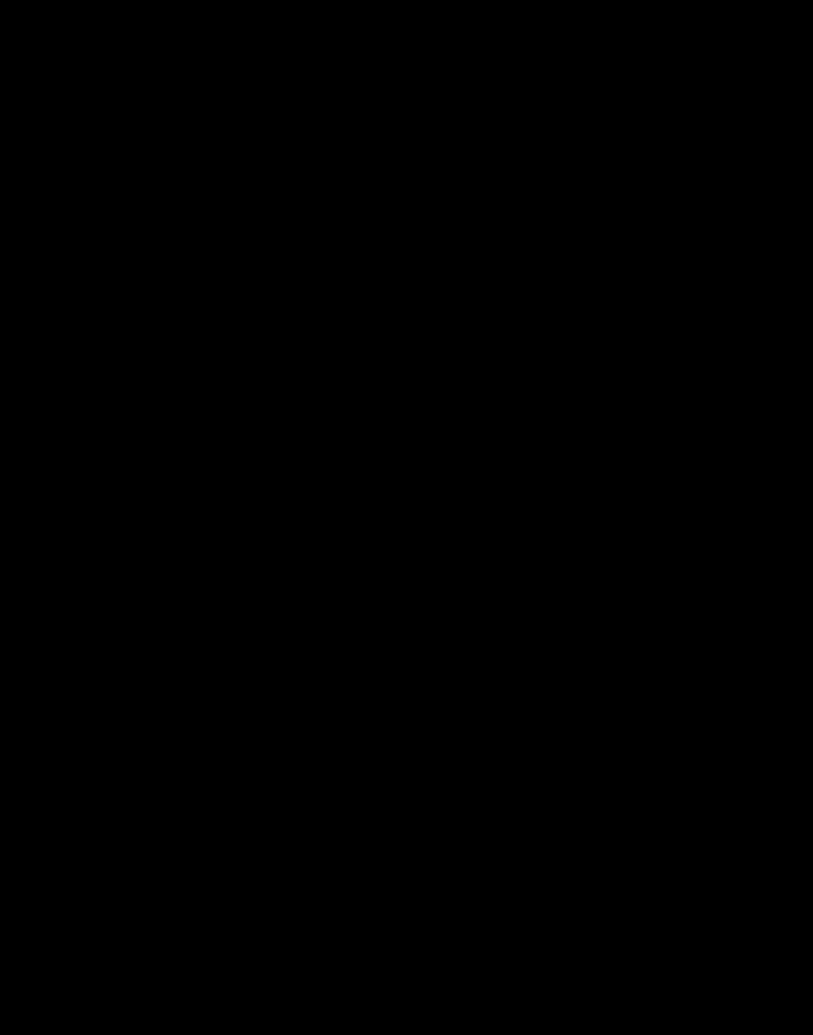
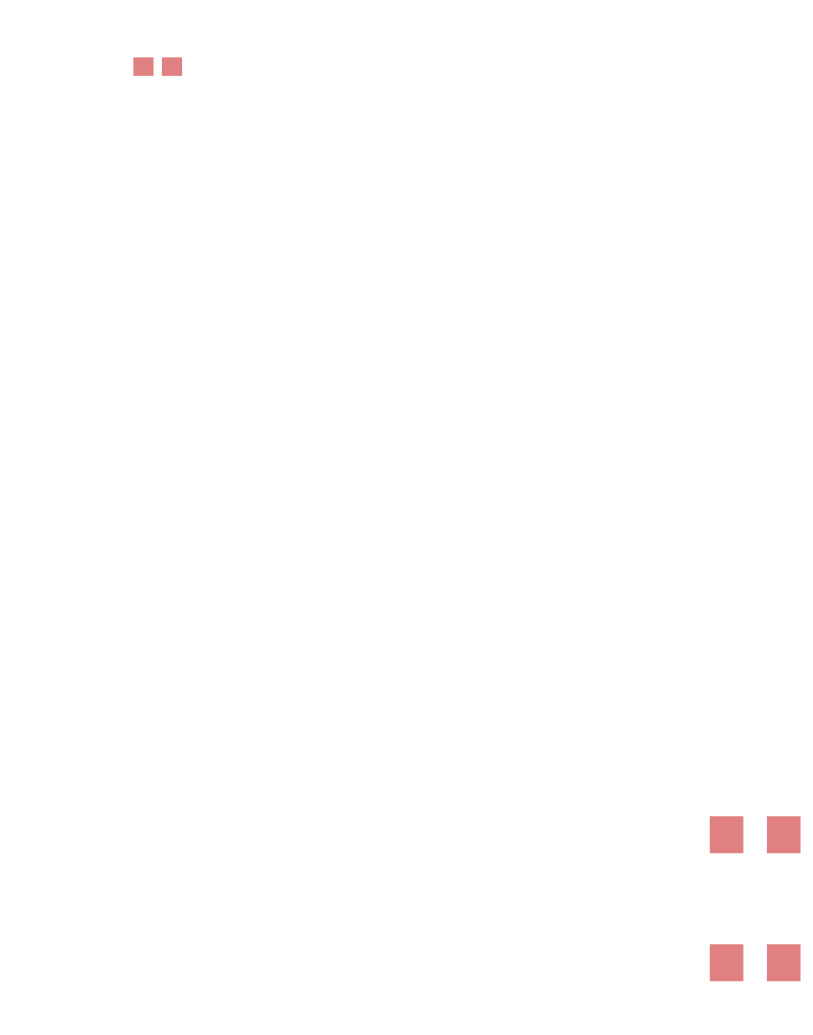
part: none -> (157, 66)
part: none -> (755, 834)
part: none -> (755, 962)

